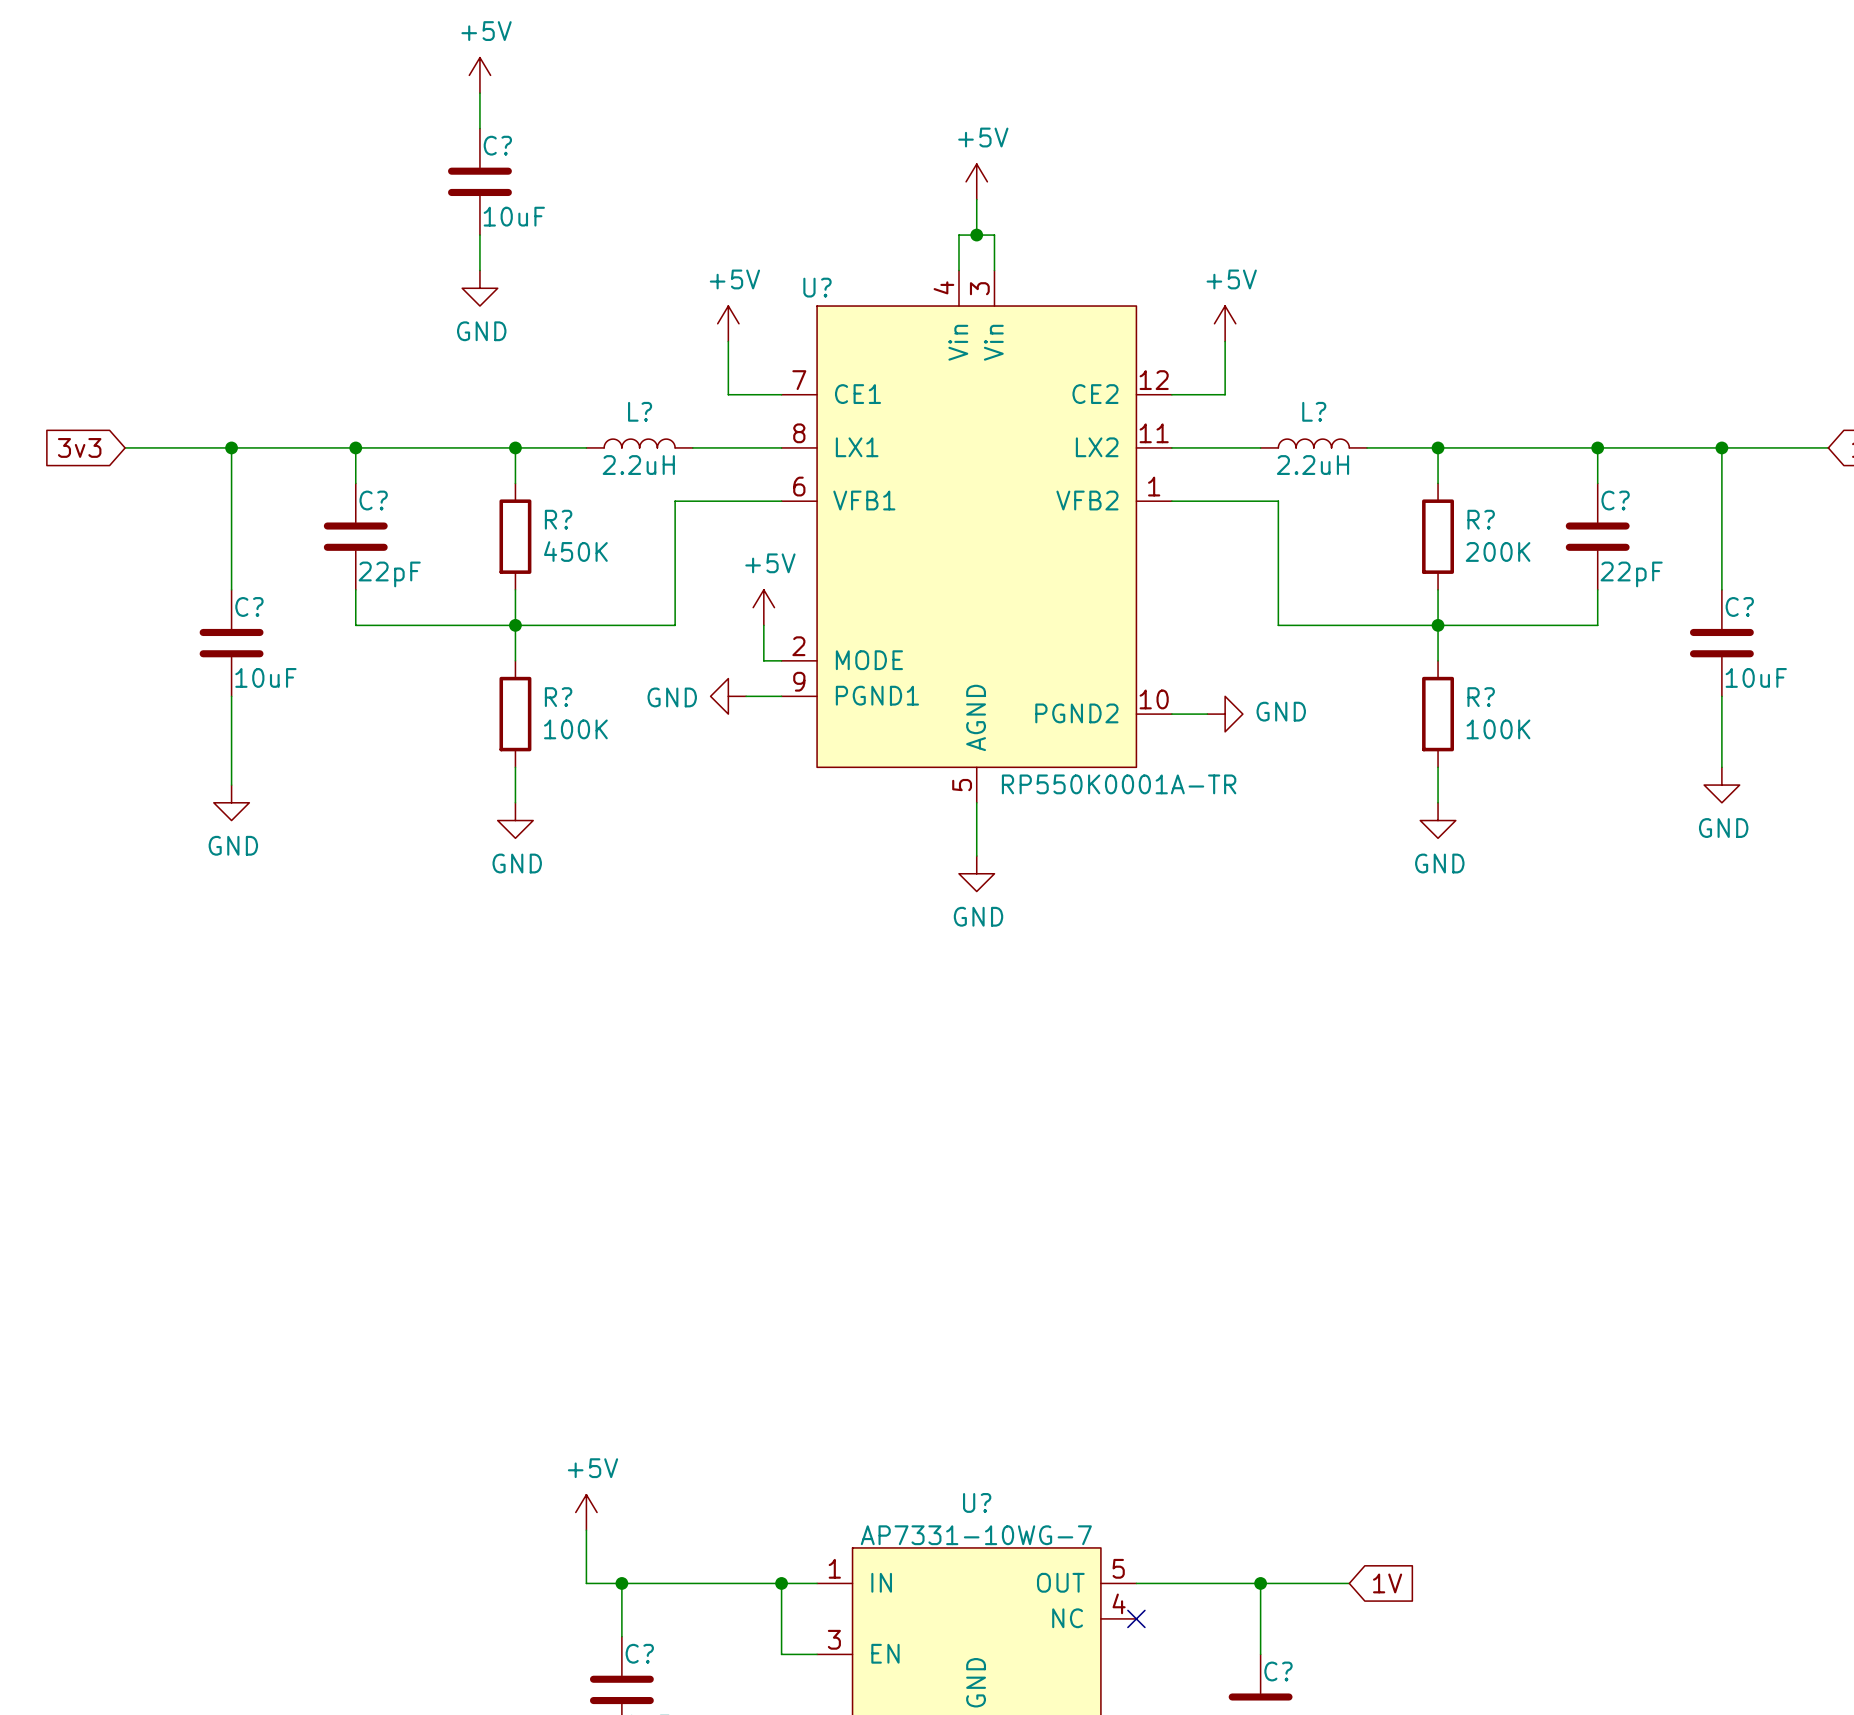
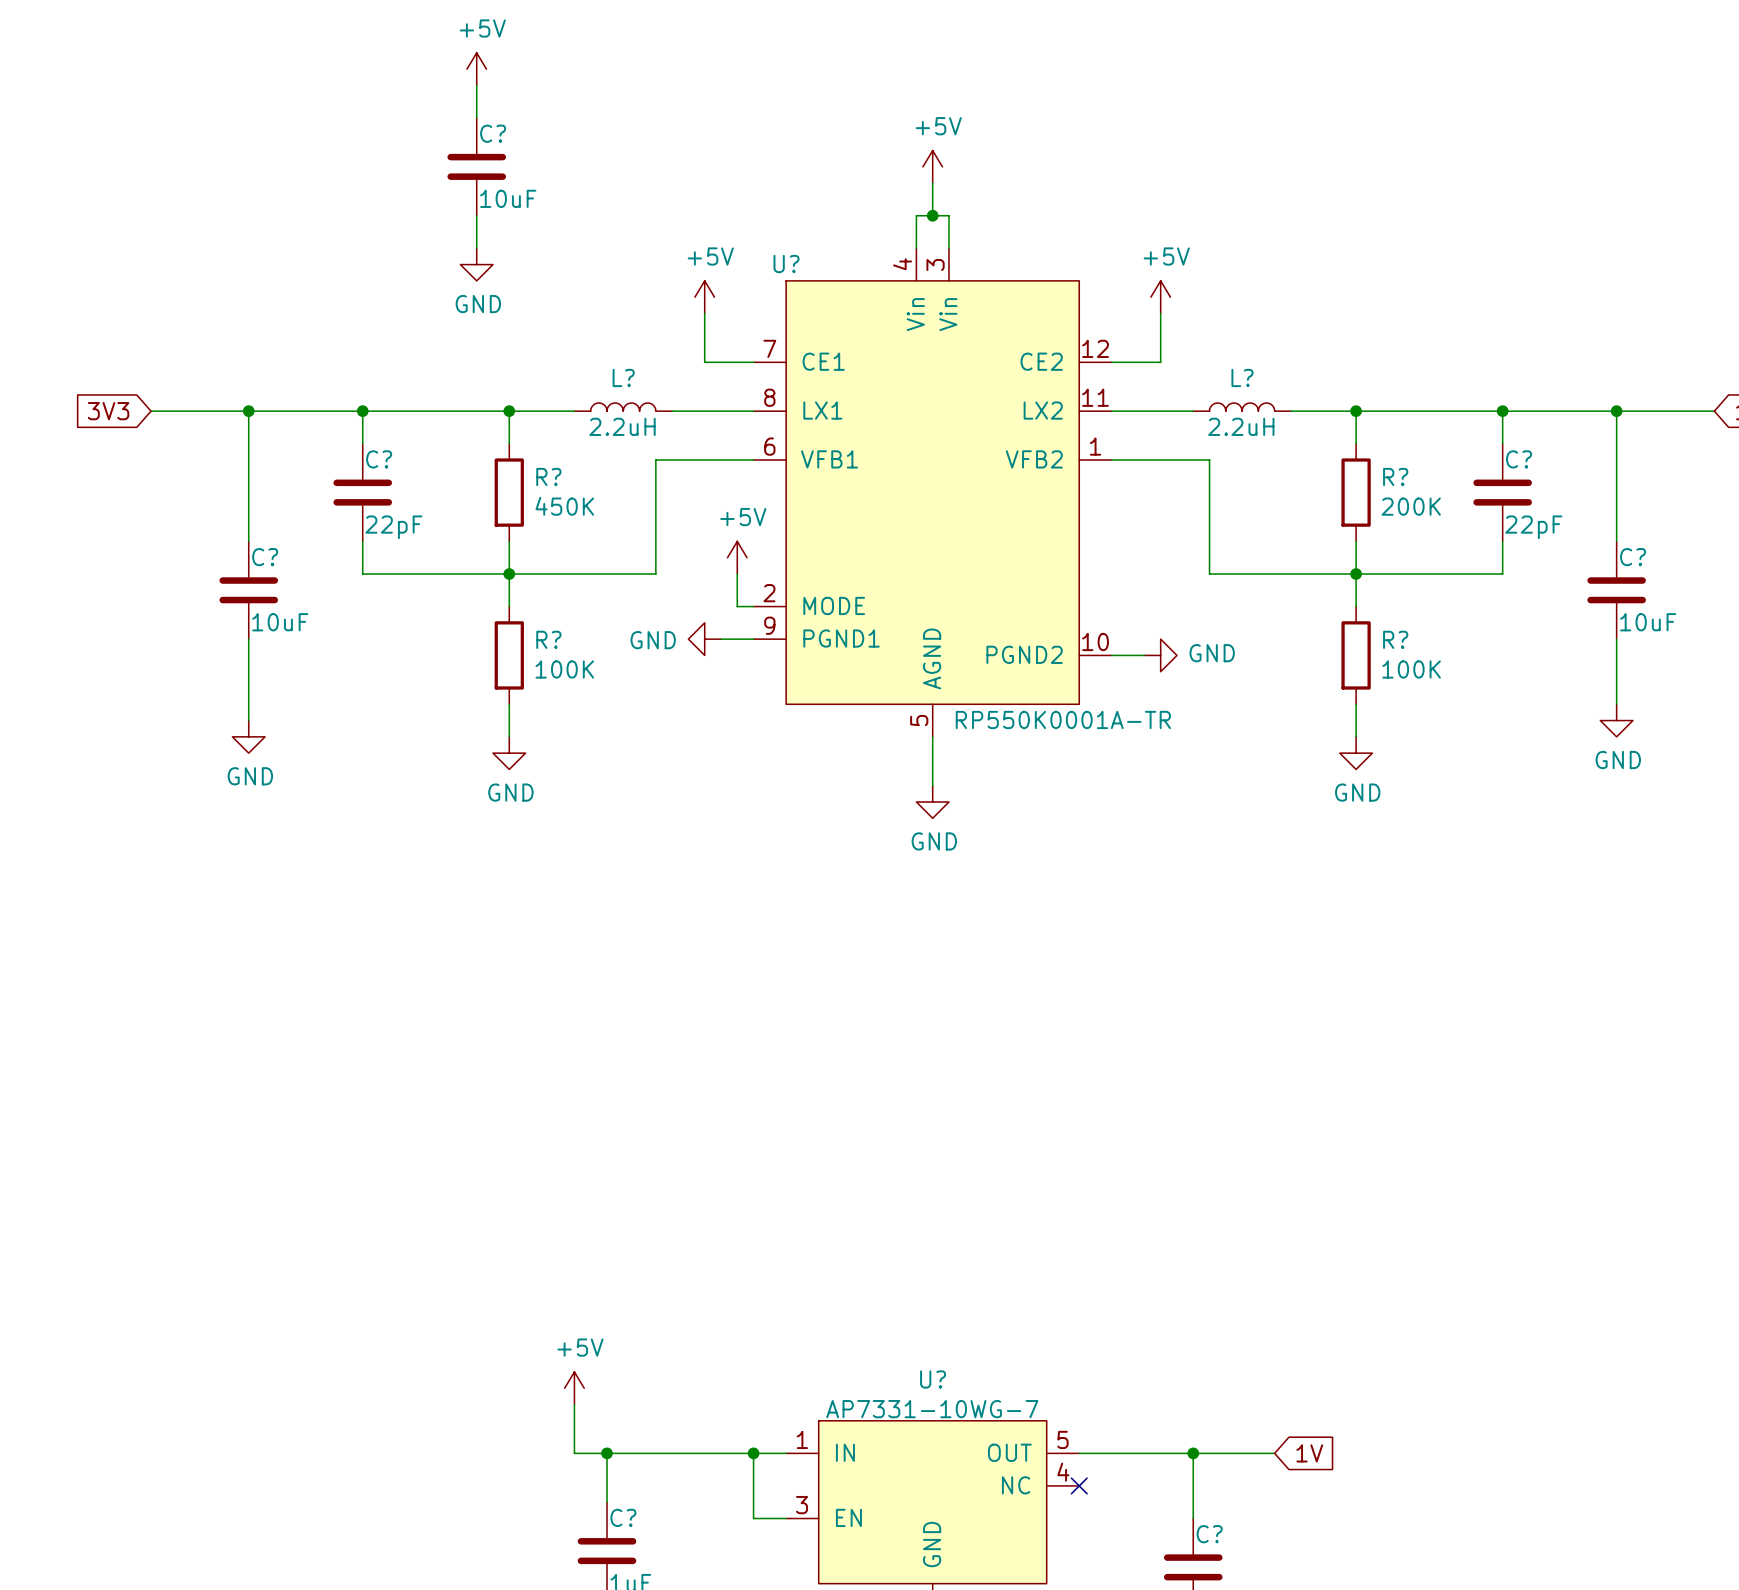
global label: 3v3 (79, 447) -> 3V3 (108, 411)

